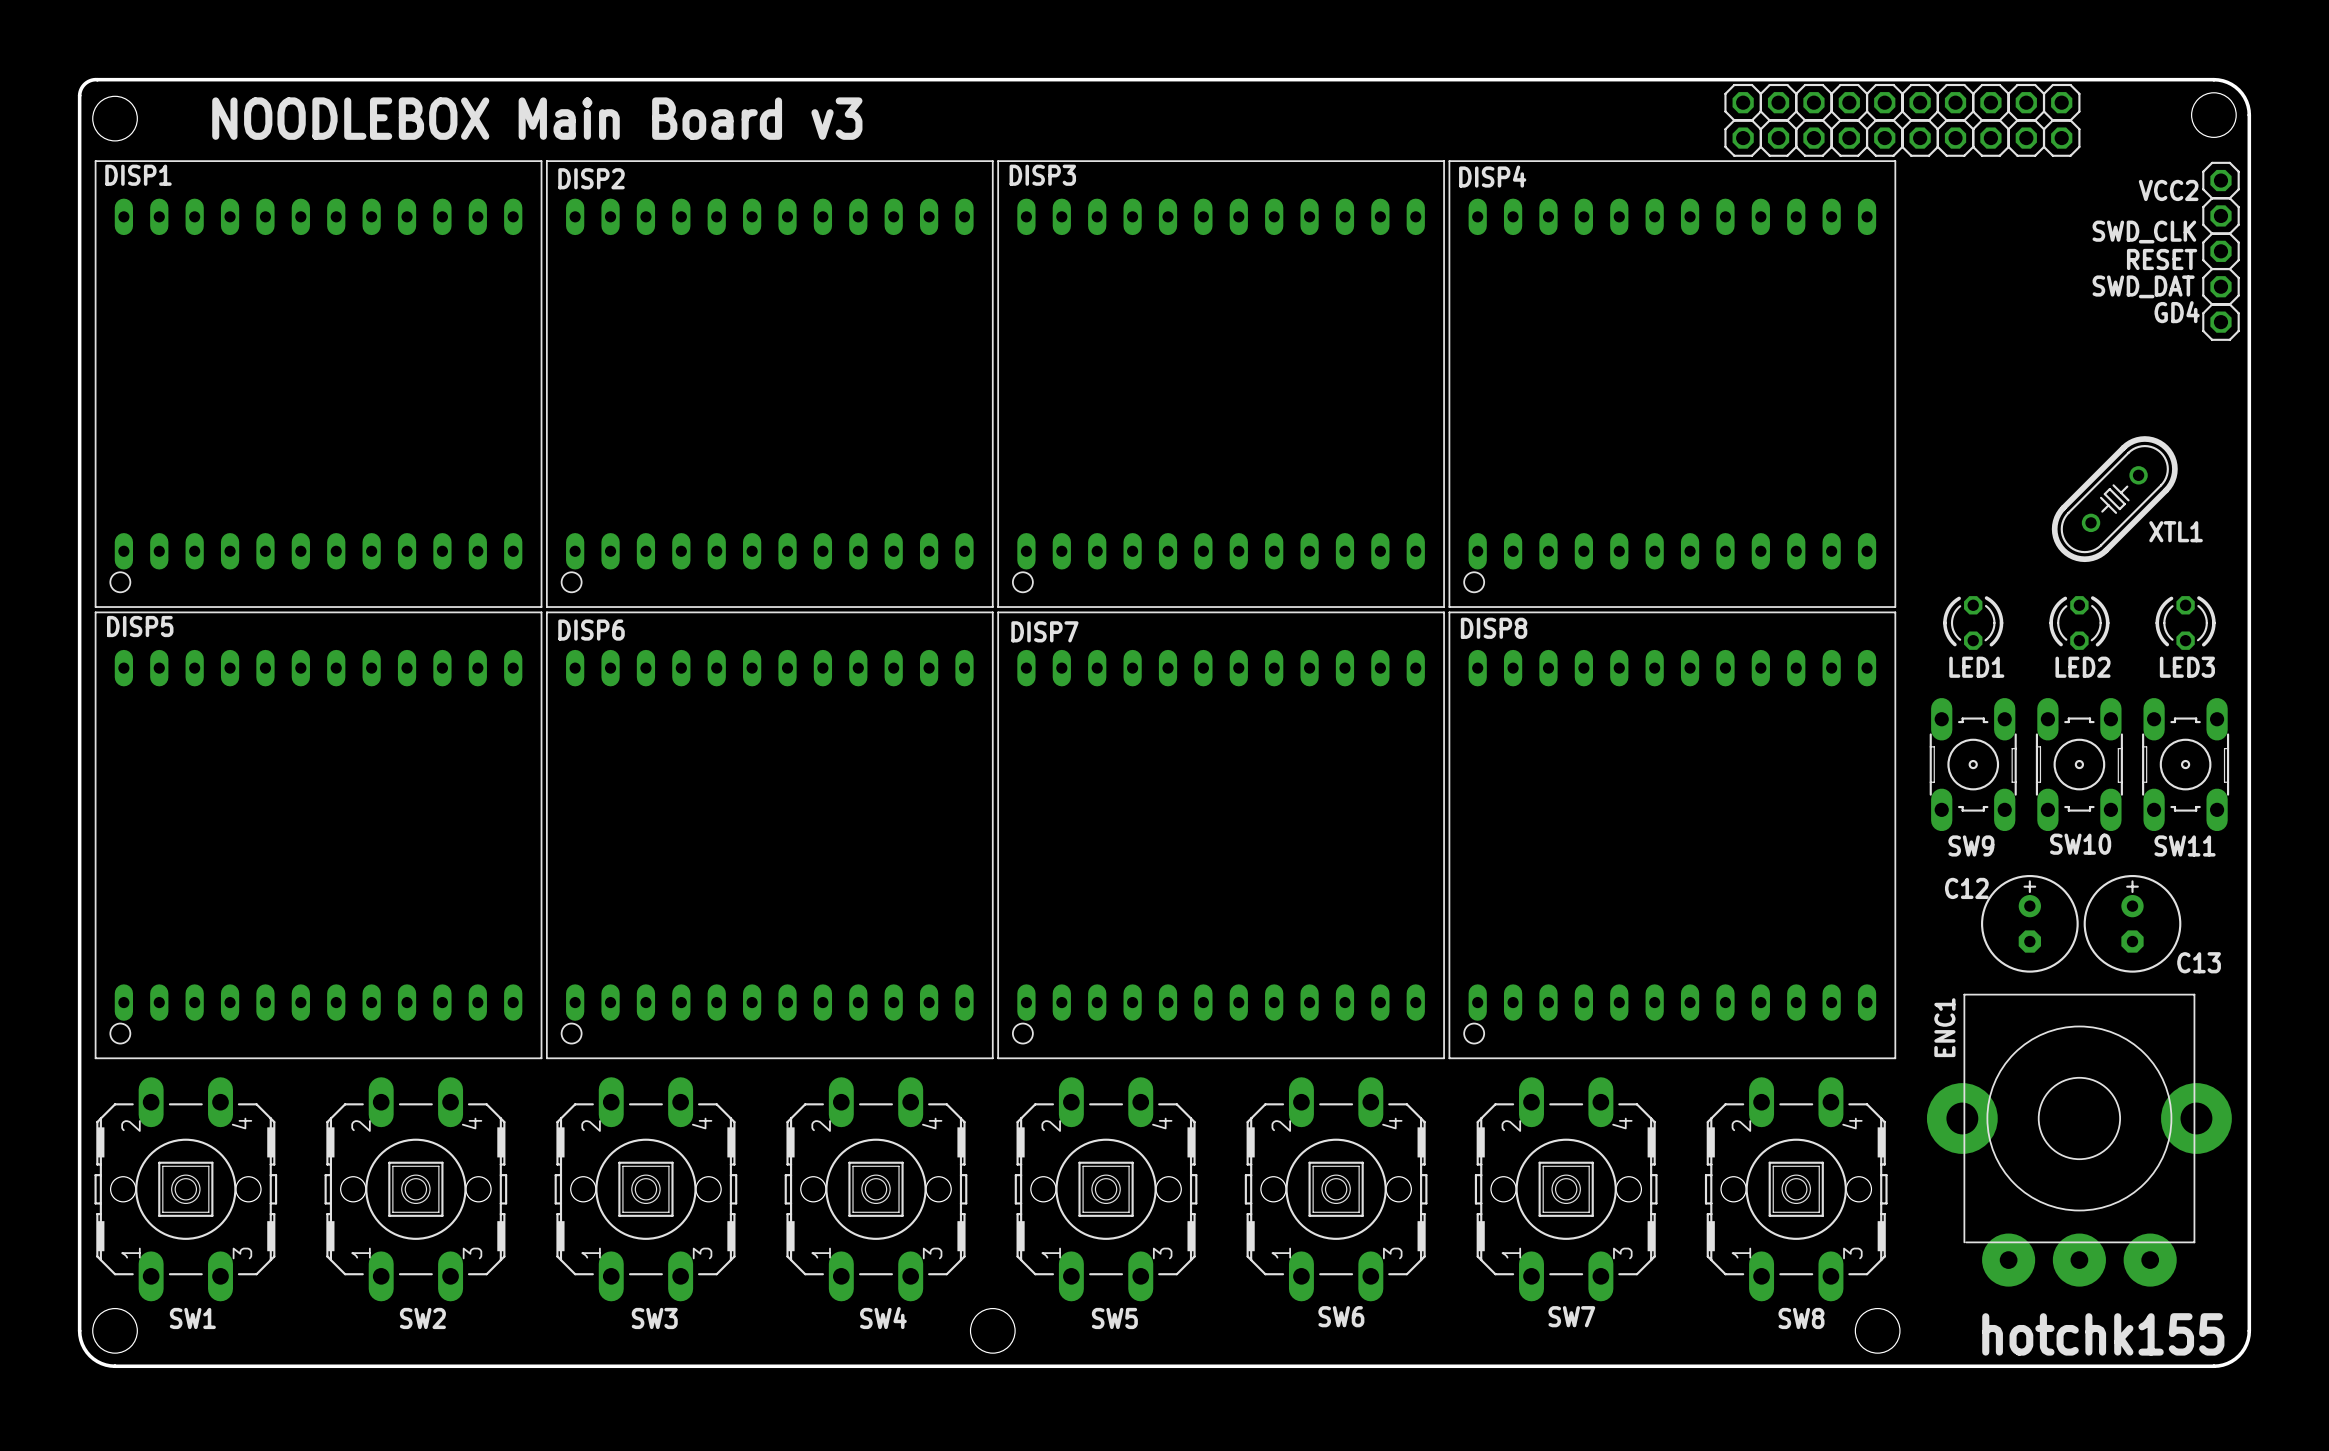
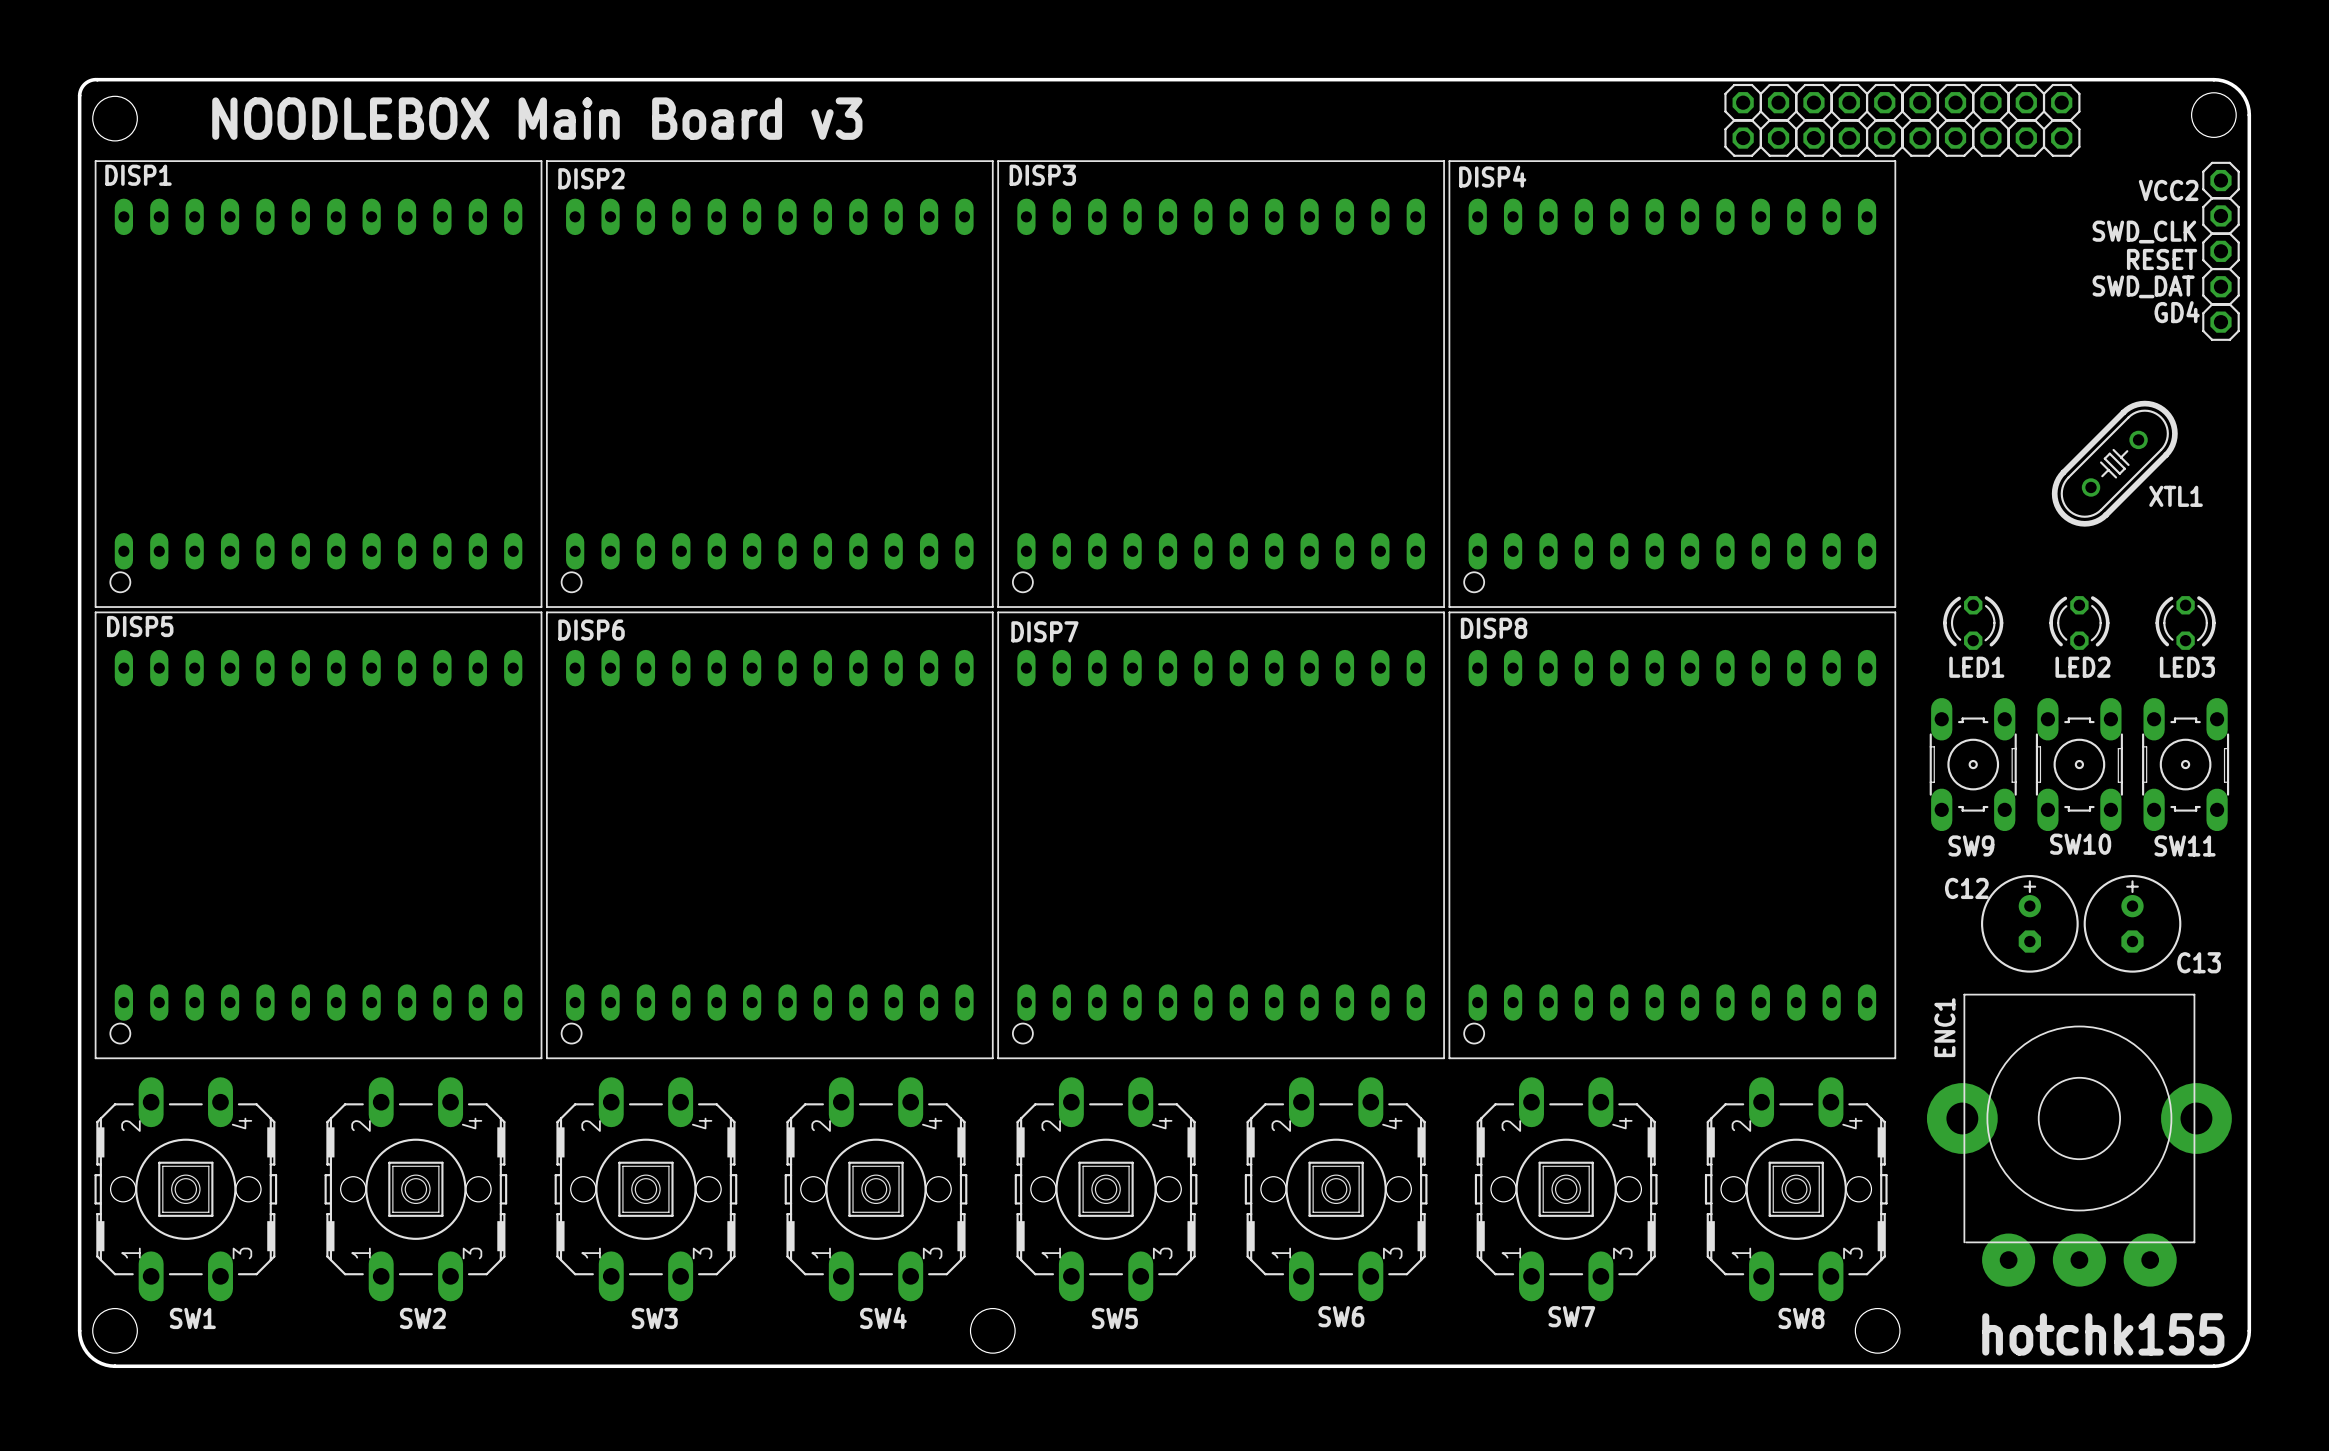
XTL1 position: (2114, 499) -> (2114, 463)

